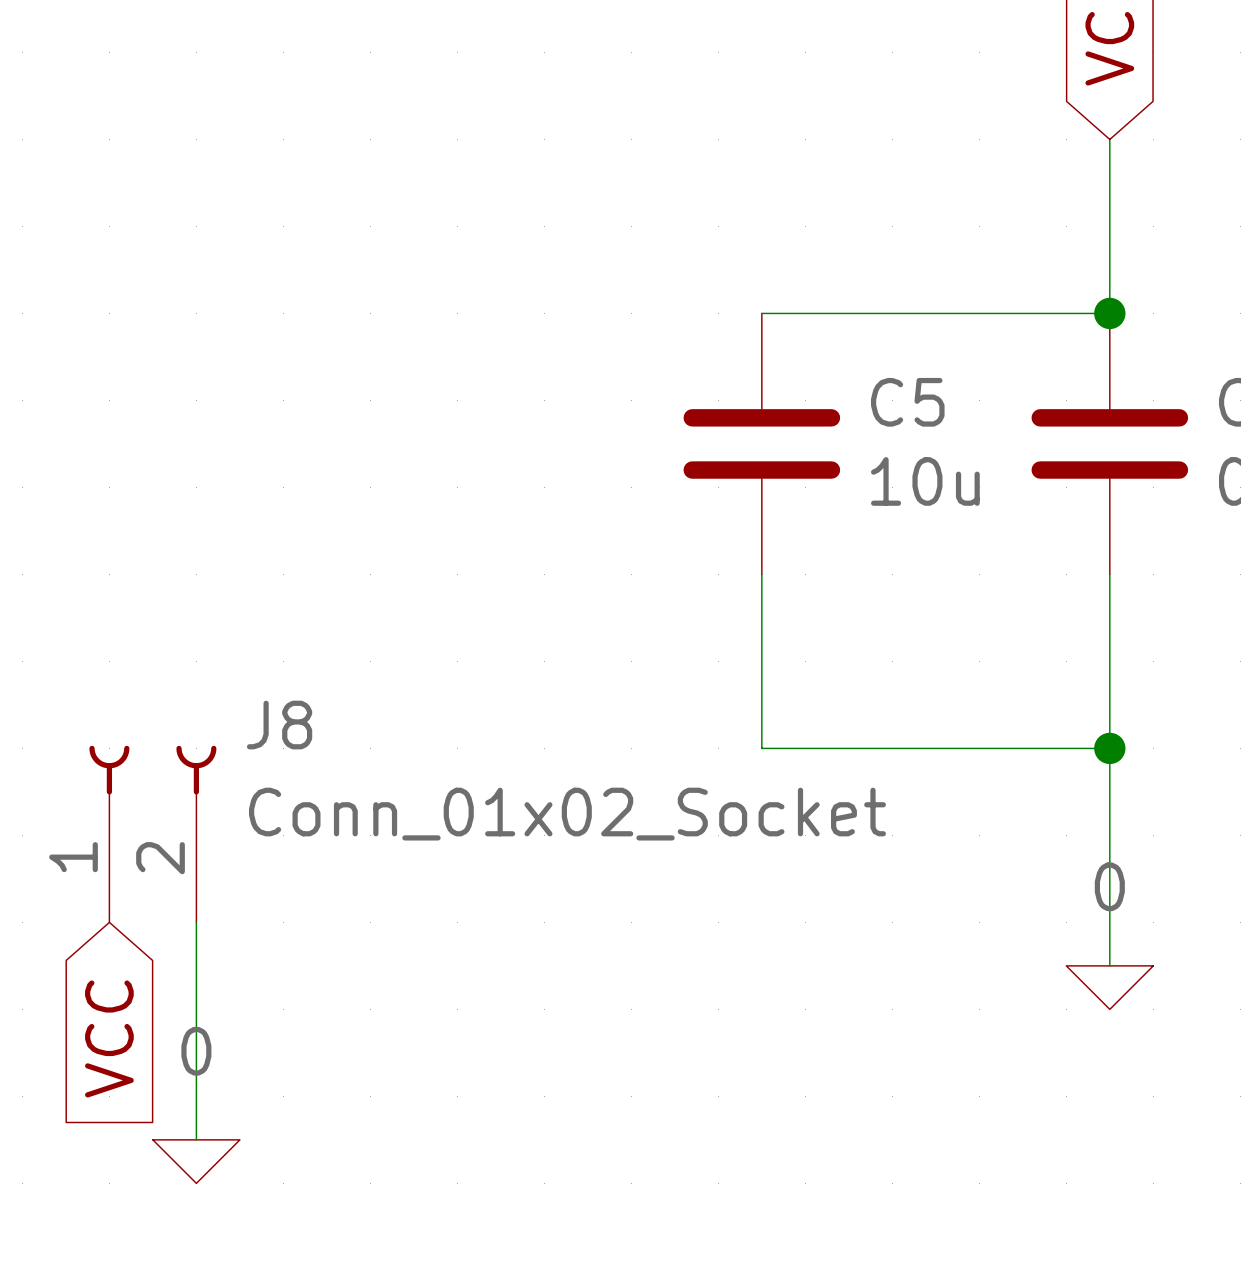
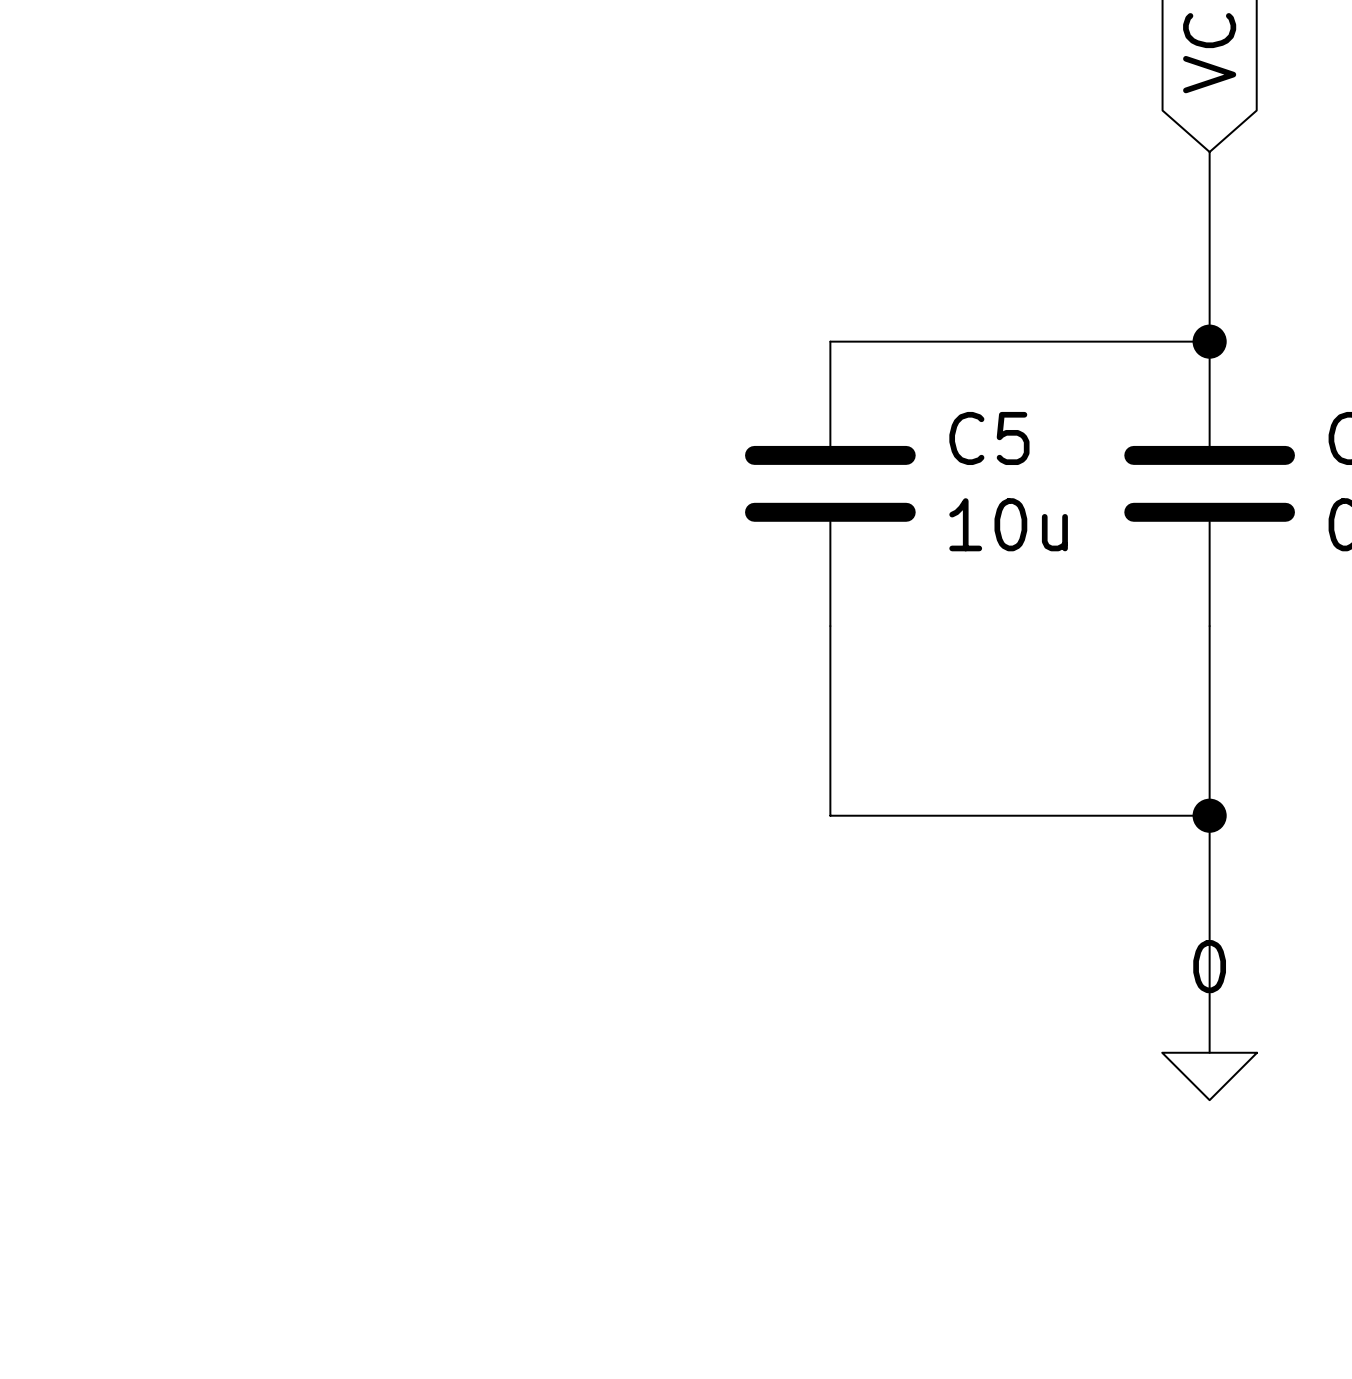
J8: Conn_01x02_Socket (152, 834) -> none
wire: (196, 922) (196, 1139) -> none
global label: VCC (109, 1038) -> none
power symbol: 0 (196, 1161) -> none

